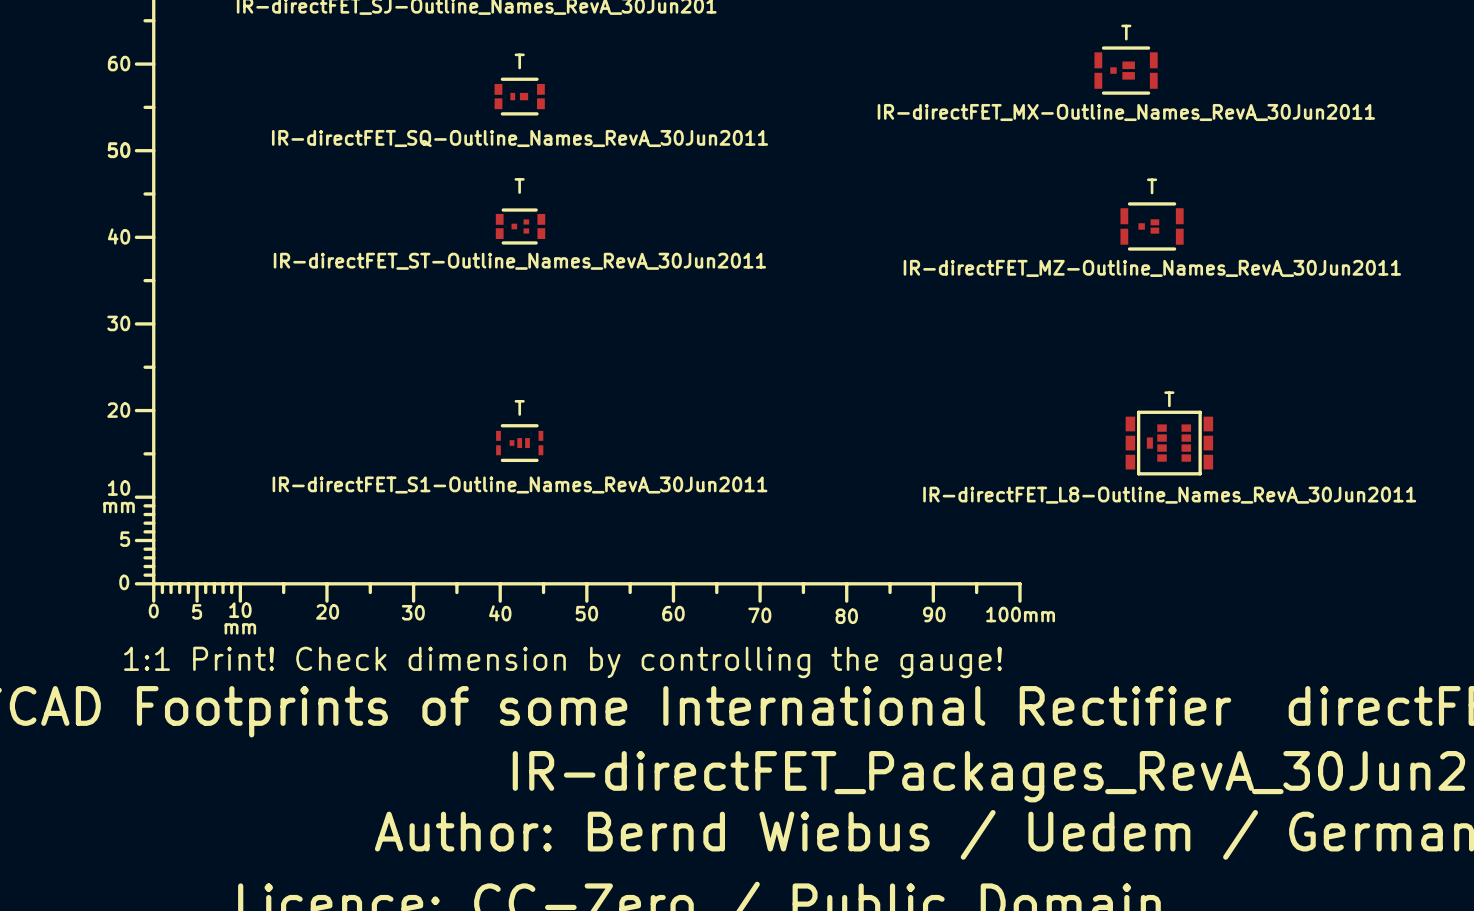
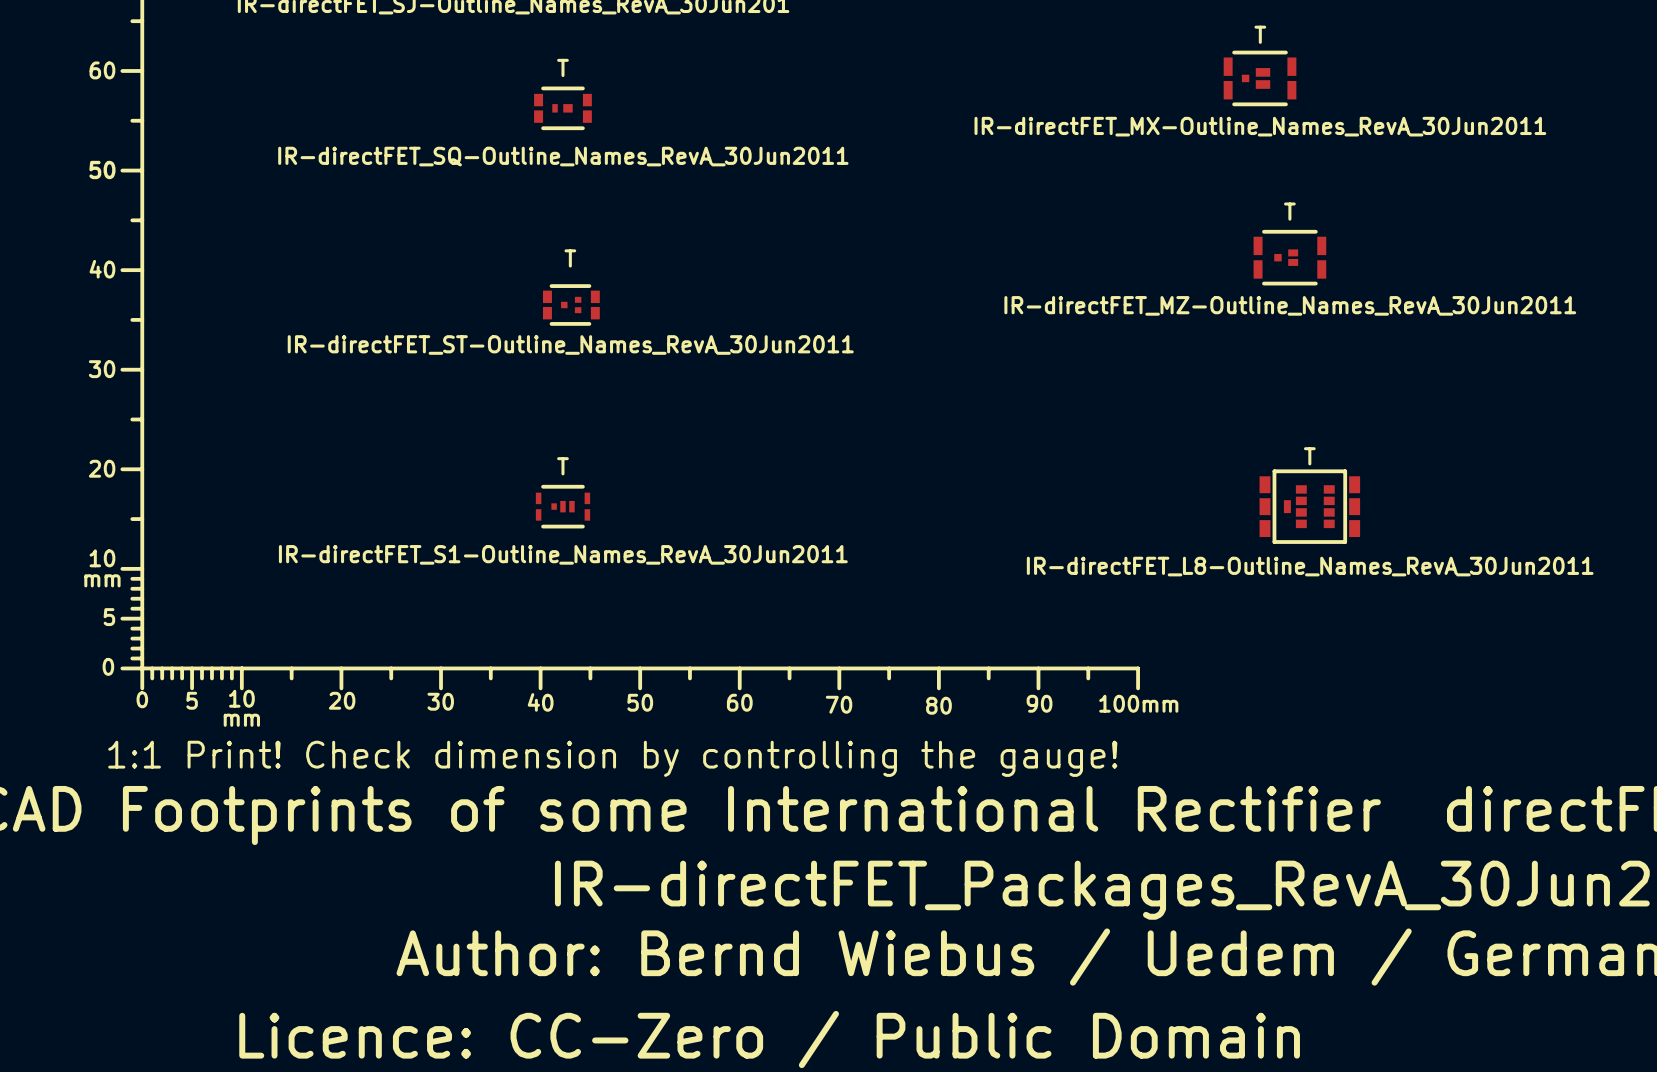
T position: (520, 226) -> (571, 305)

